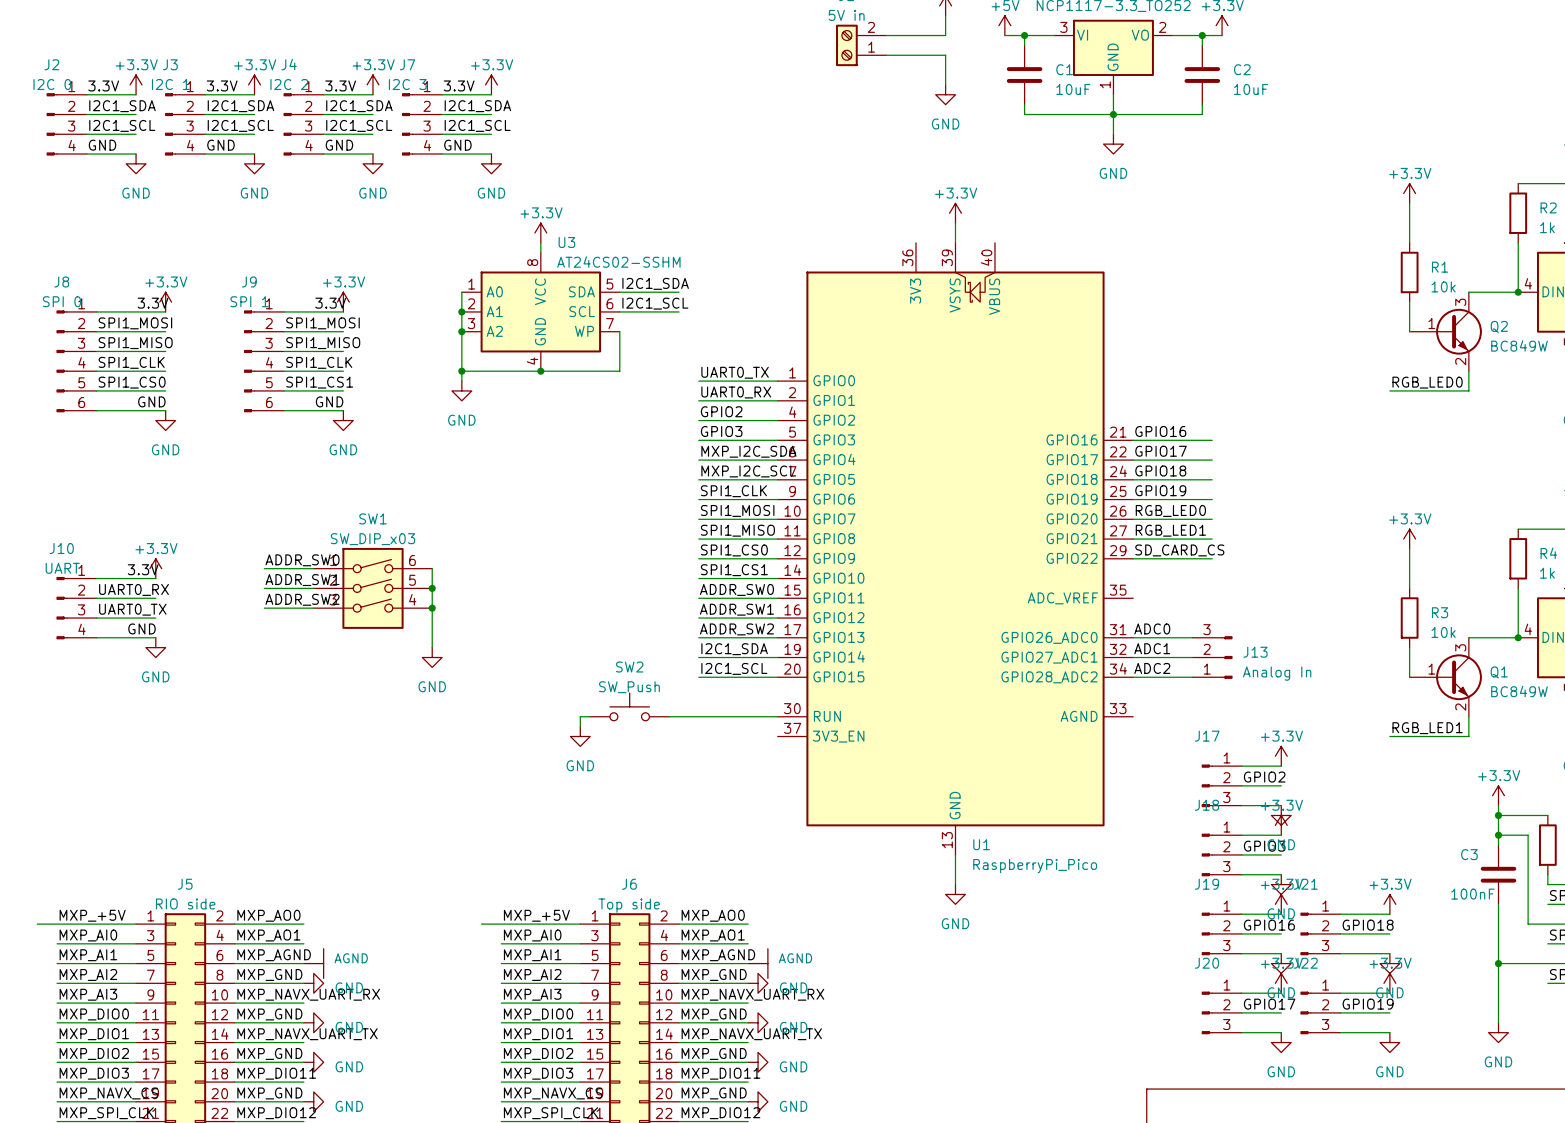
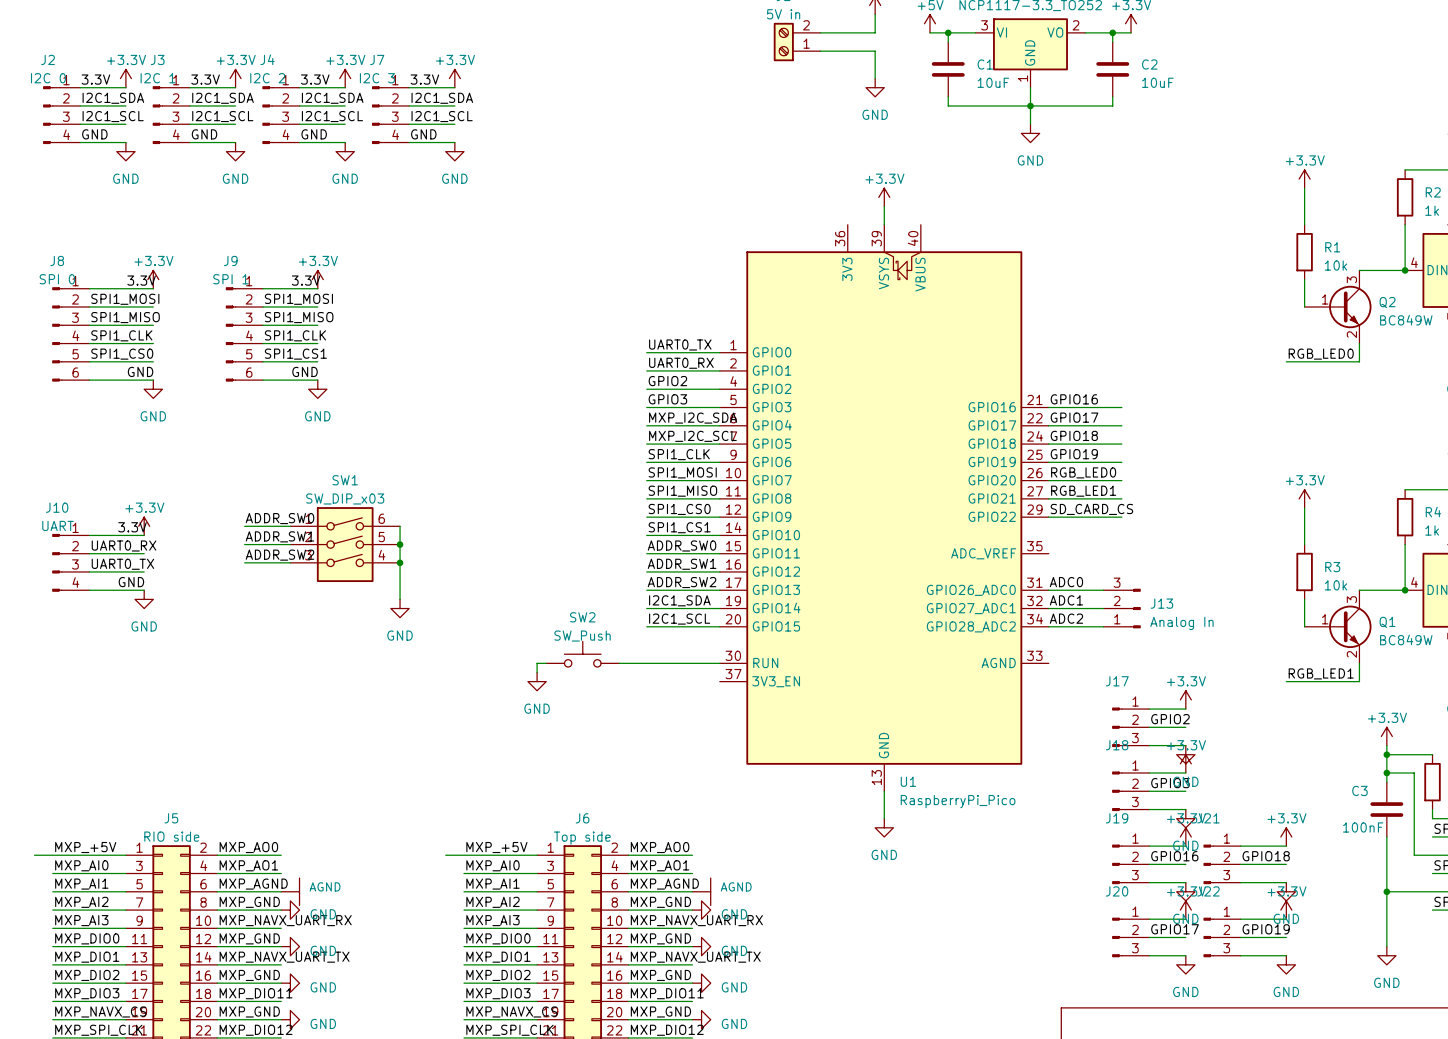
power symbol: +3.3V (540, 232) -> none
wire: (540, 242) (540, 252) -> none
label: I2C1_SDA (655, 283) -> none
wire: (461, 292) (461, 381) -> none
wire: (619, 292) (679, 292) -> none
label: I2C1_SCL (655, 303) -> none
junction: (461, 311) -> none
U3: AT24CS02-SSHM (540, 311) -> none
wire: (619, 311) (679, 311) -> none
junction: (461, 331) -> none
wire: (619, 331) (619, 371) (461, 371) -> none
junction: (461, 371) -> none
junction: (540, 371) -> none
power symbol: GND (461, 390) -> none

